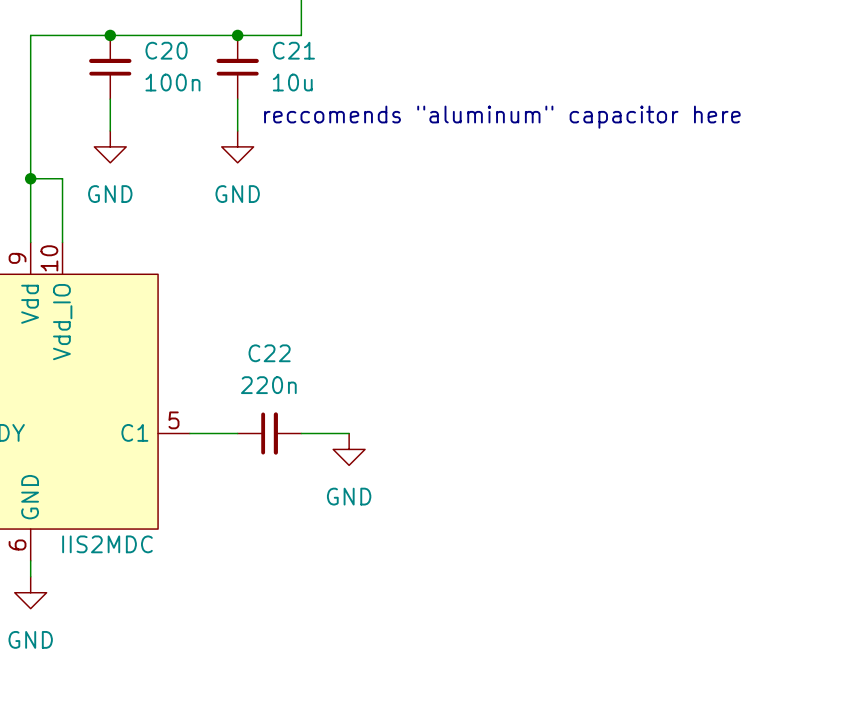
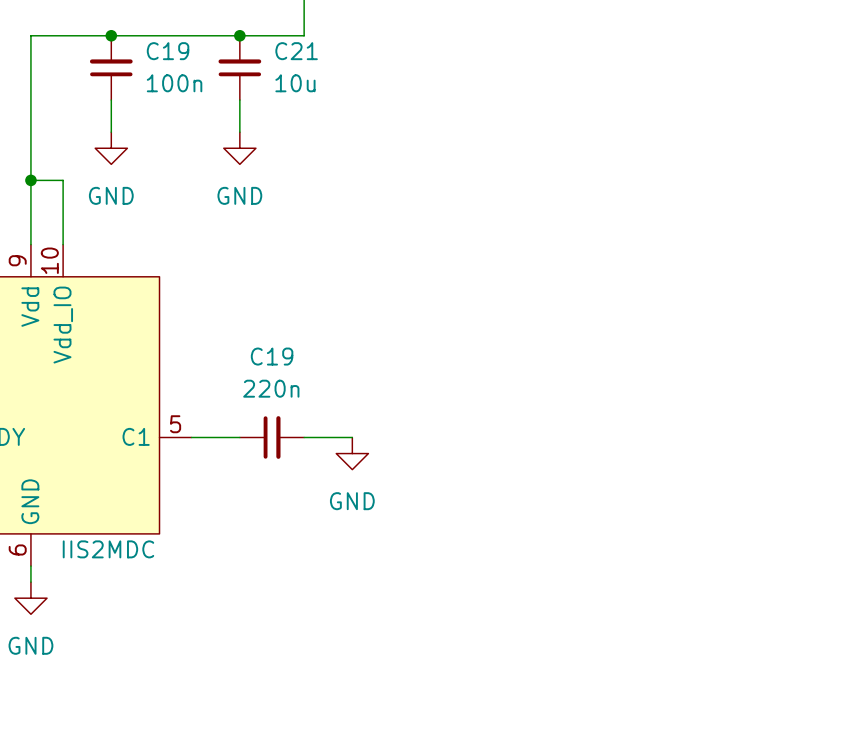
C20 name: C20 (166, 50) -> C19 (168, 51)
text: reccomends "aluminum" capacitor here (502, 117) -> none
C22 name: C22 (269, 353) -> C19 (272, 356)

